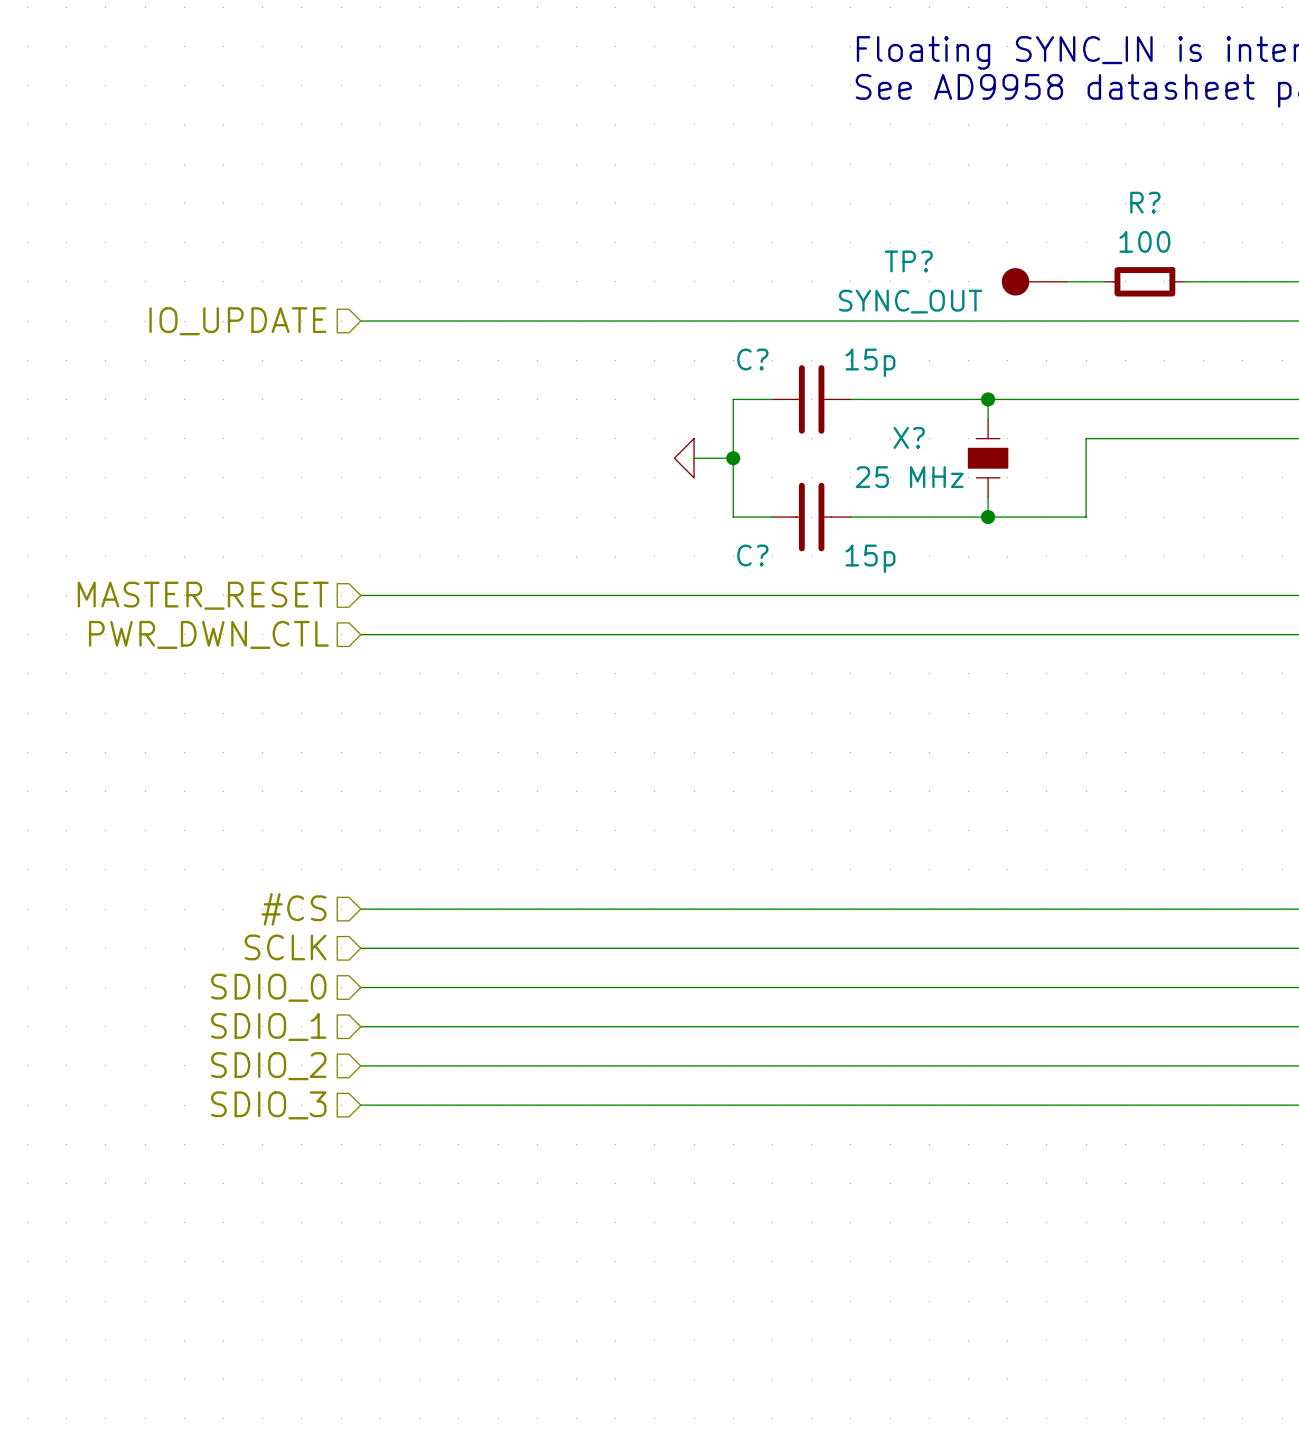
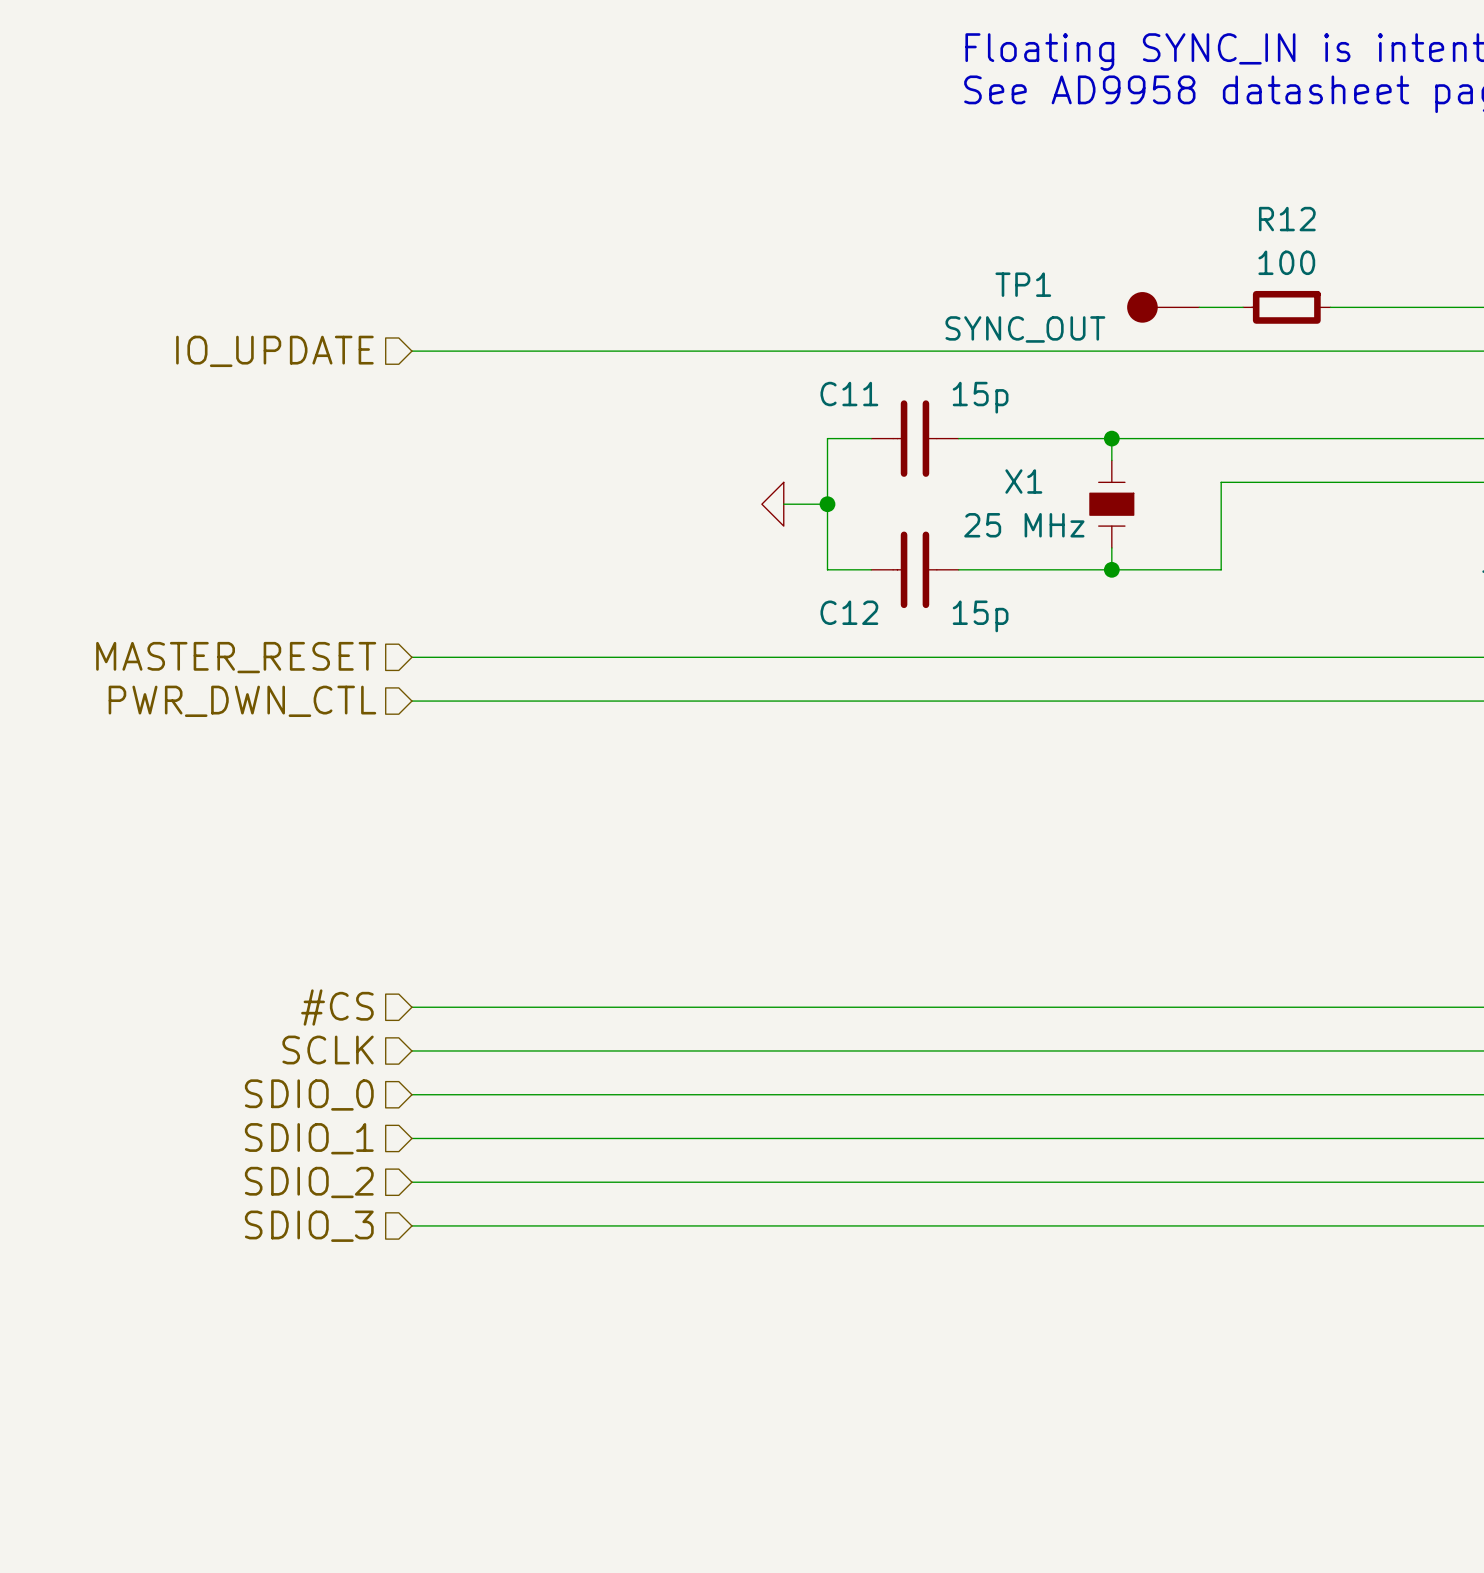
R? name: R? (1145, 202) -> R12 (1287, 219)
TP? name: TP? (908, 261) -> TP1 (1023, 284)
C? name: C? (752, 359) -> C11 (849, 394)
X? name: X? (909, 437) -> X1 (1023, 481)
C? name: C? (752, 555) -> C12 (849, 612)

